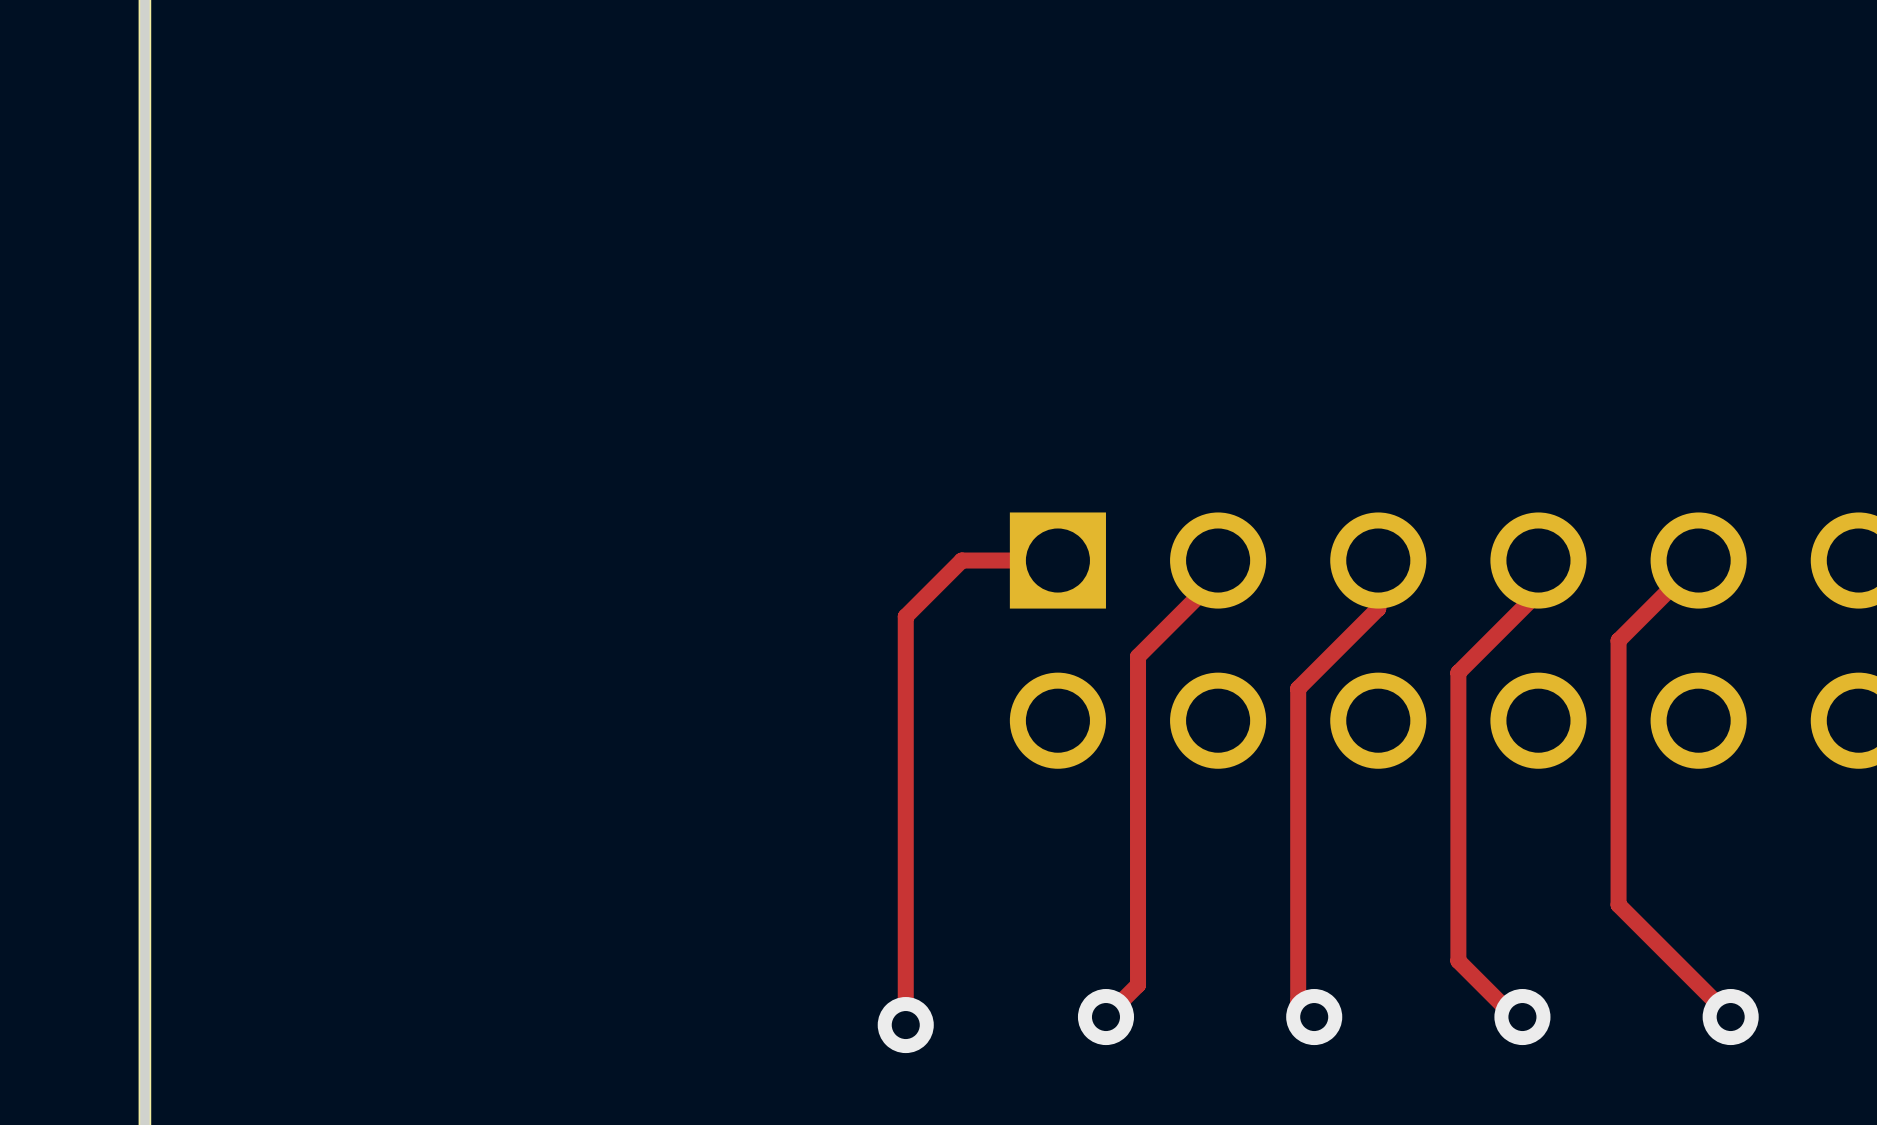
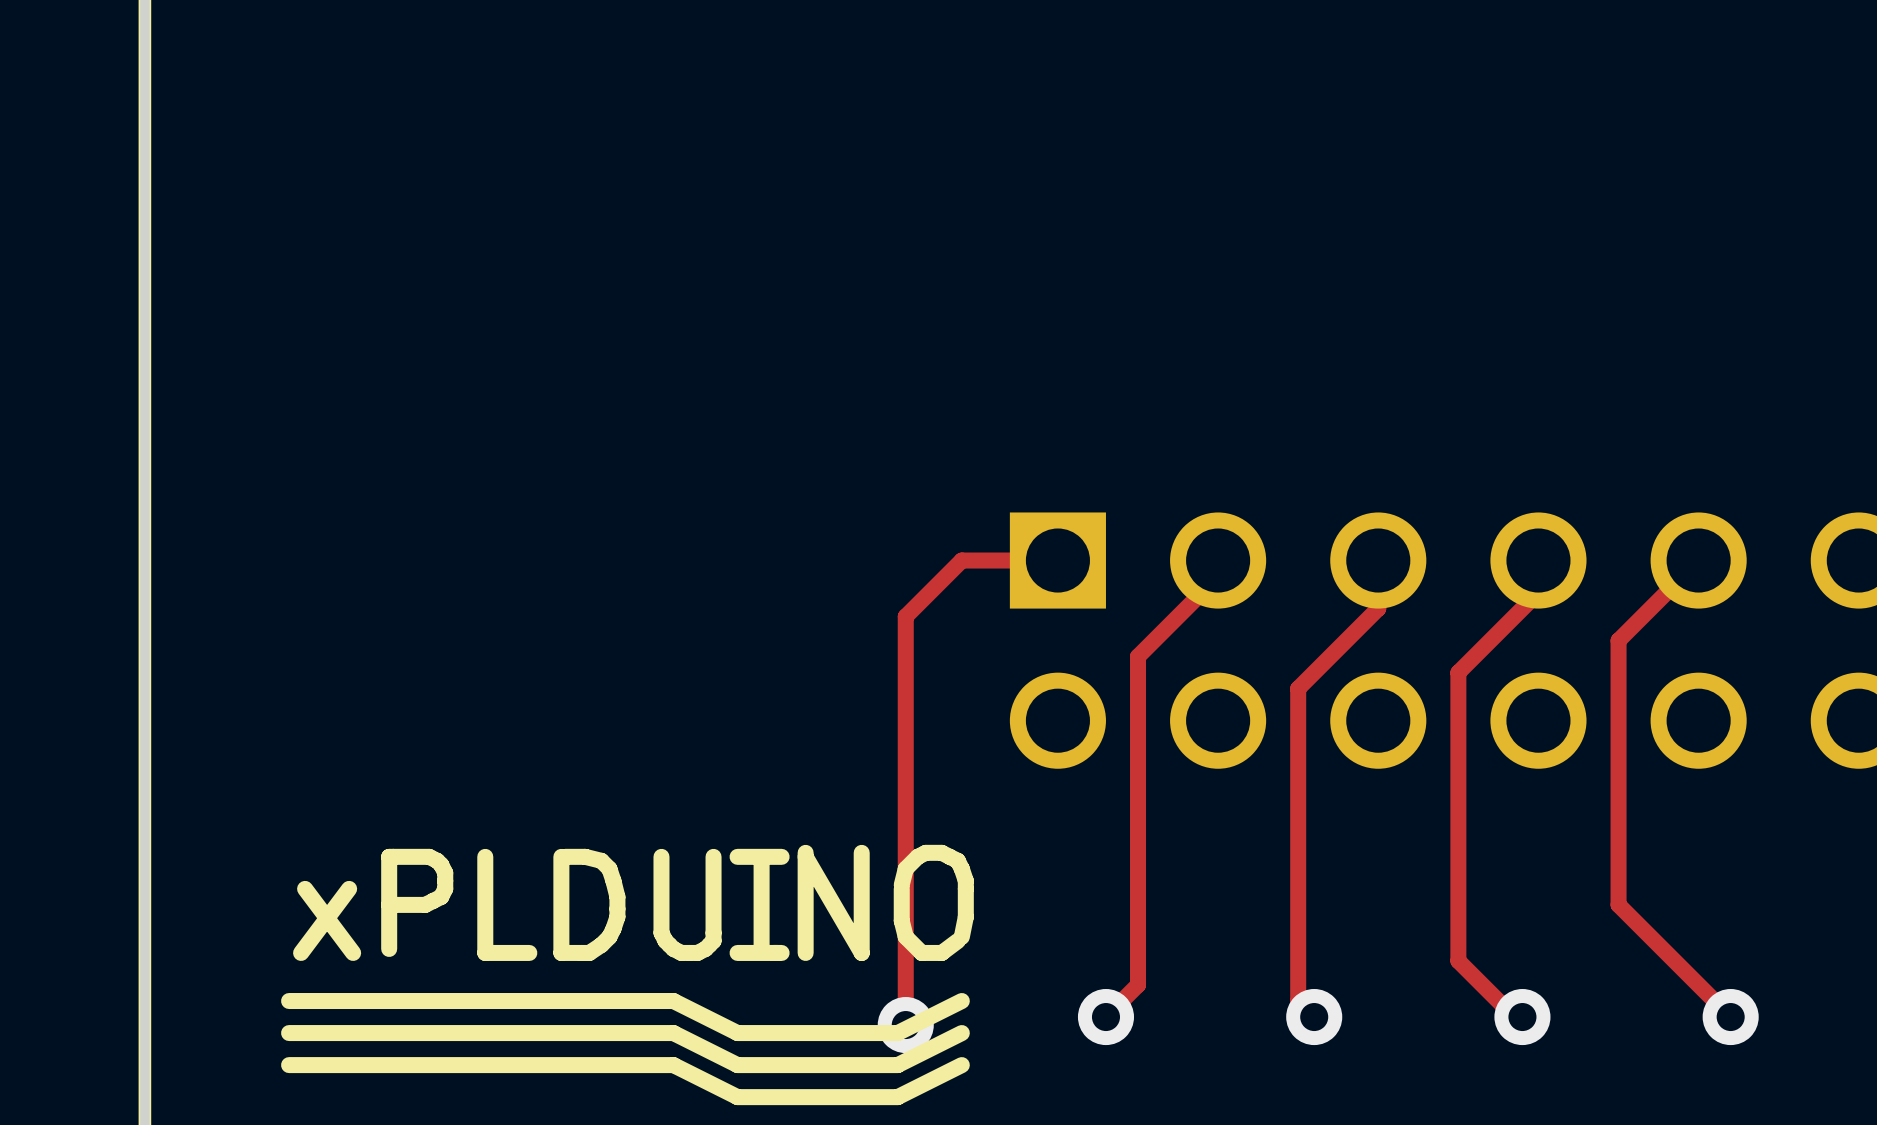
drawing: none -> [281, 844, 974, 1106]

